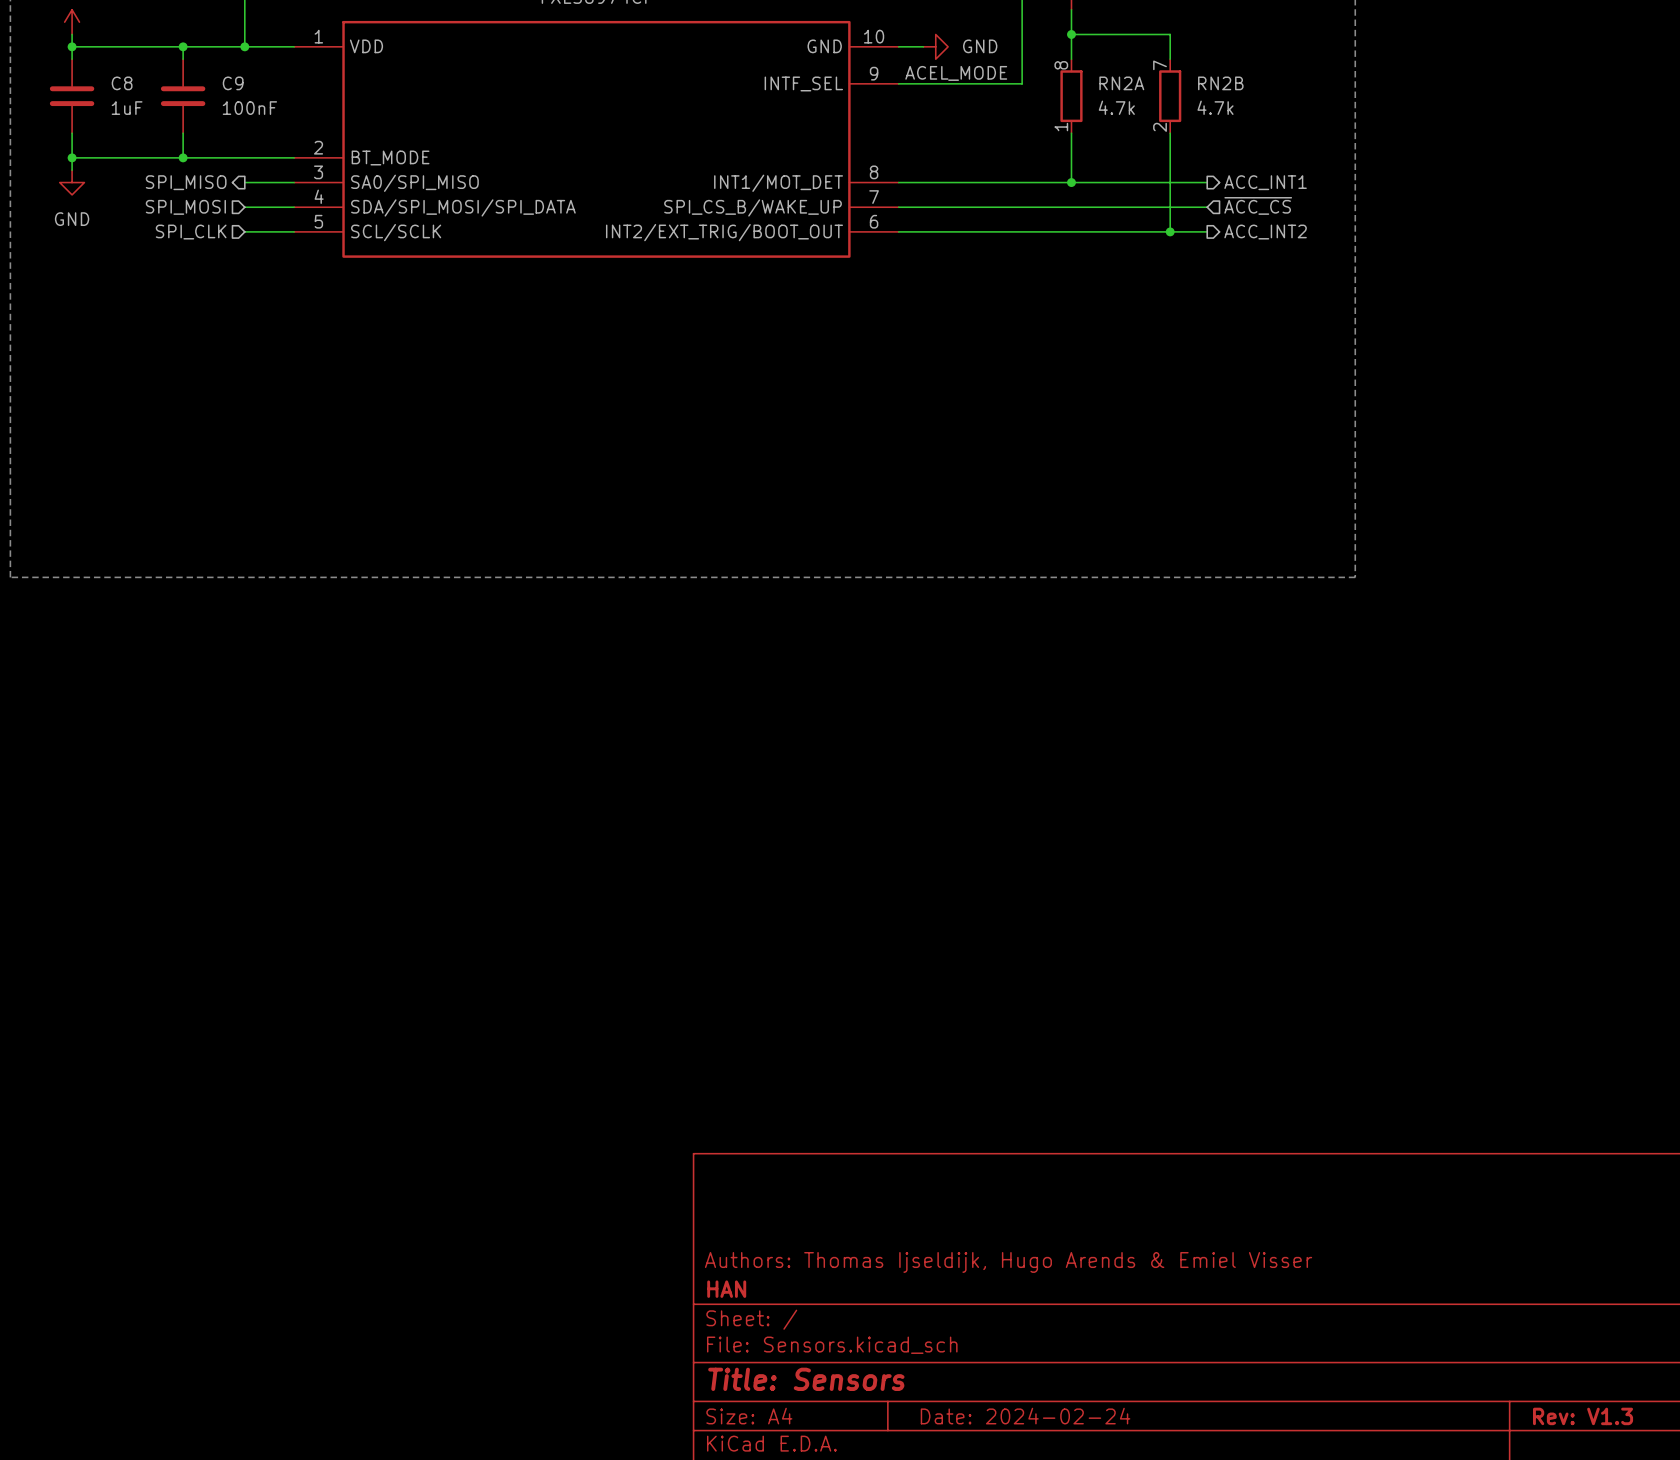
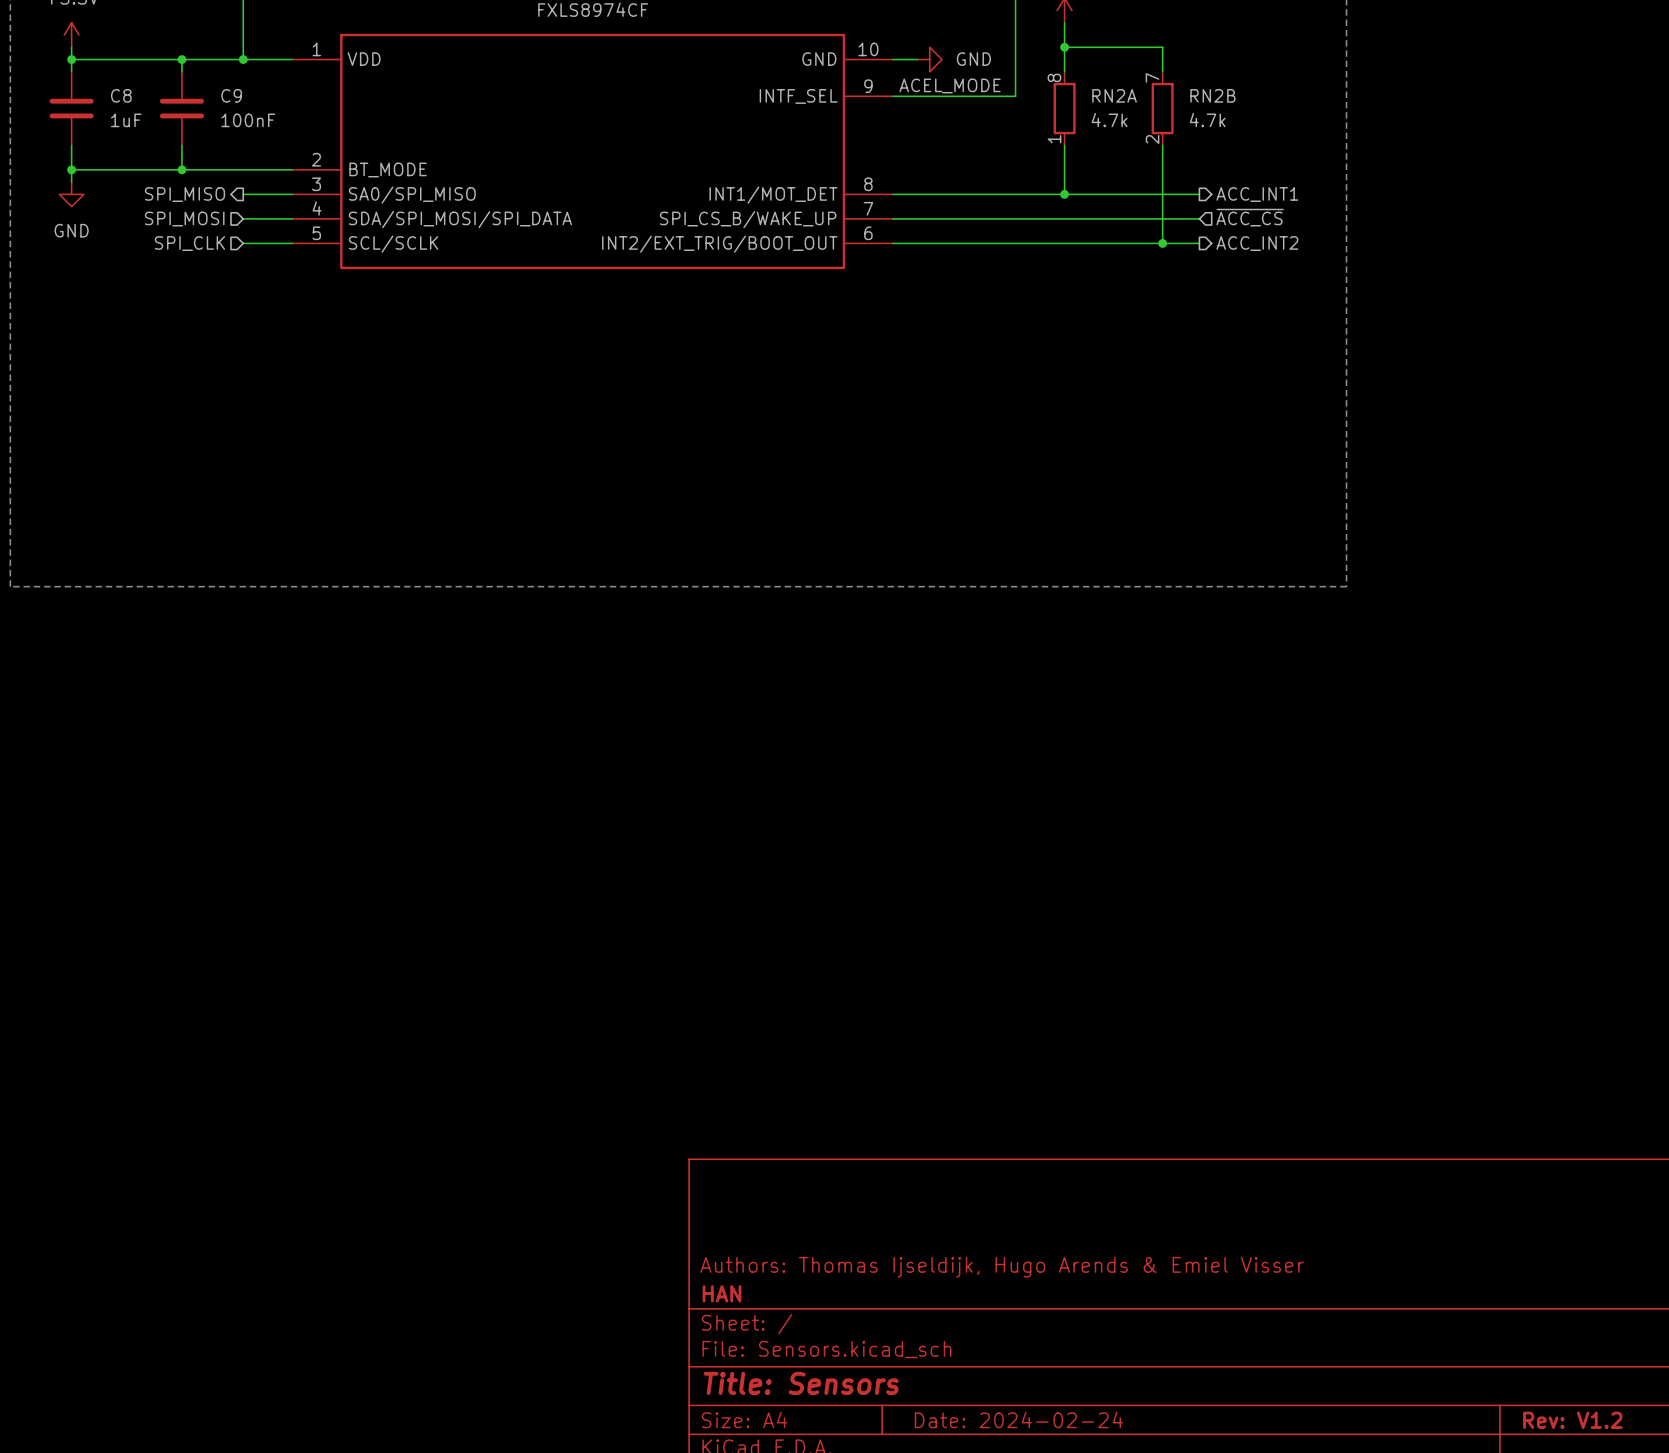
title block: Rev: V1.3 (1583, 1416) -> Rev: V1.2 (1572, 1420)

